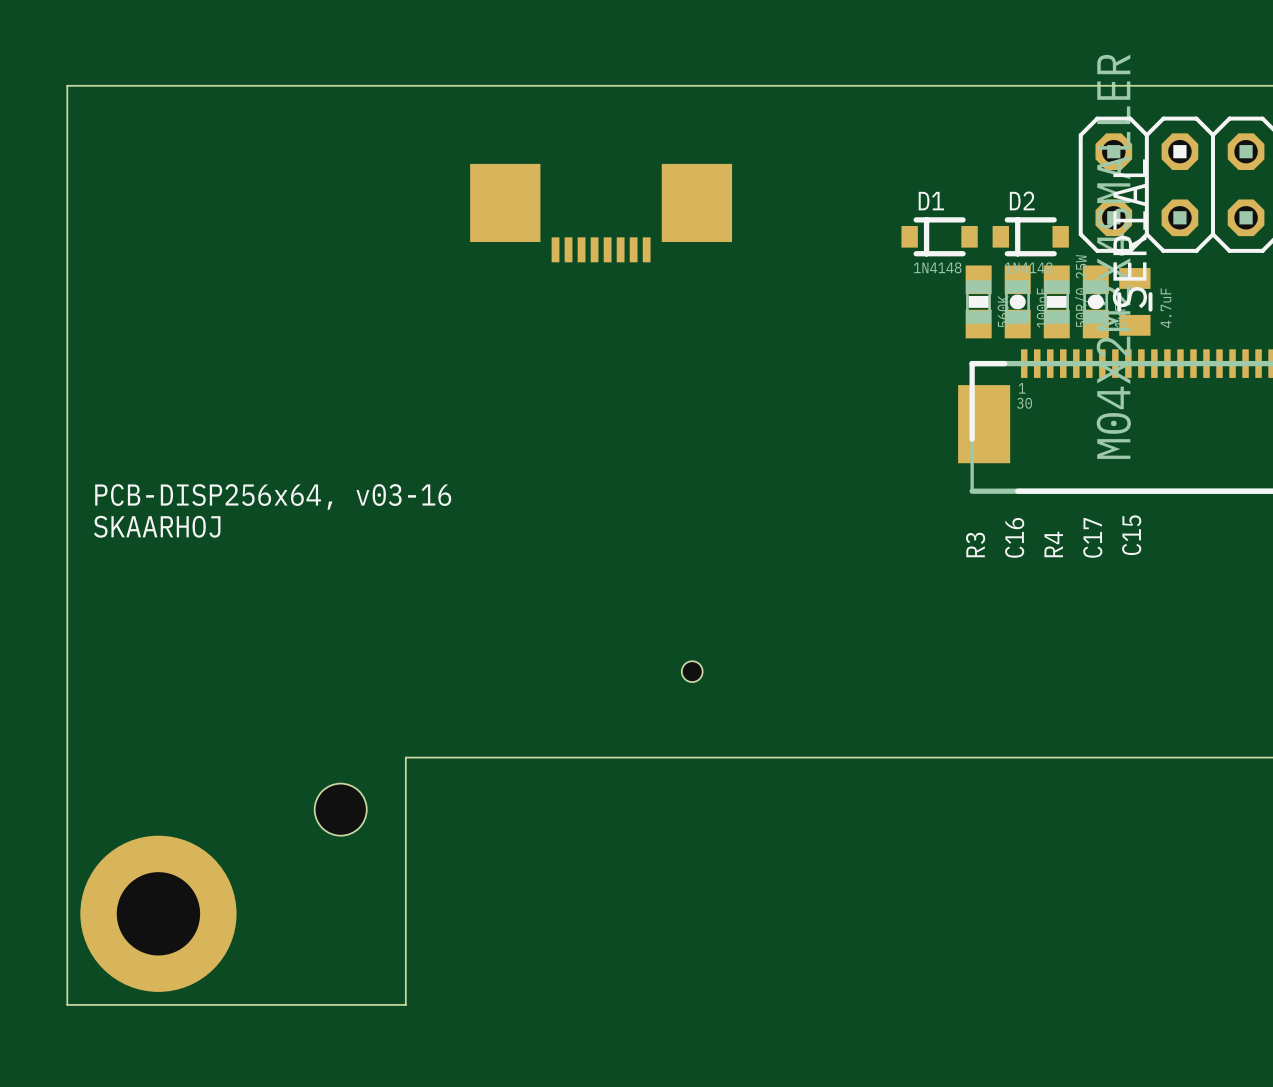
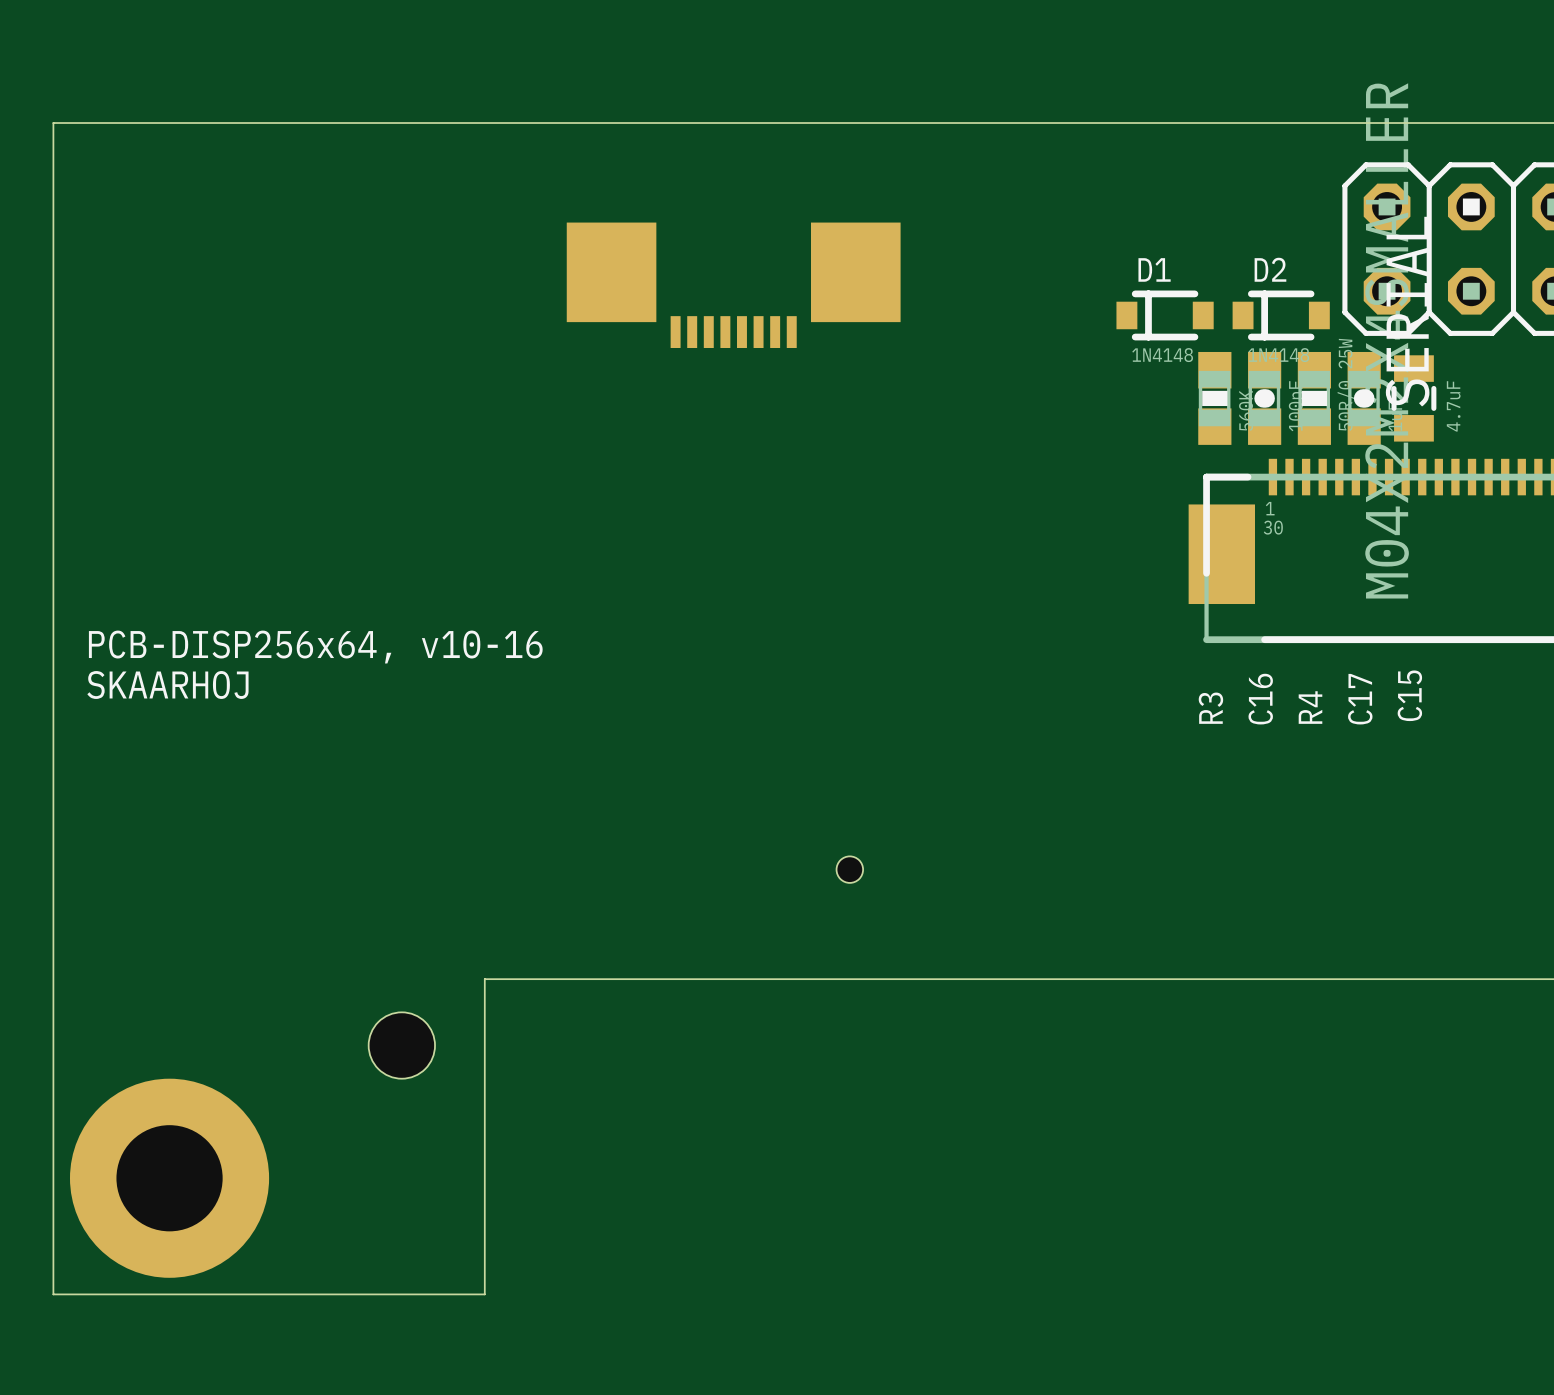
text: PCB-DISP256x64, v03-16 (273, 496) -> PCB-DISP256x64, v10-16 (315, 647)

